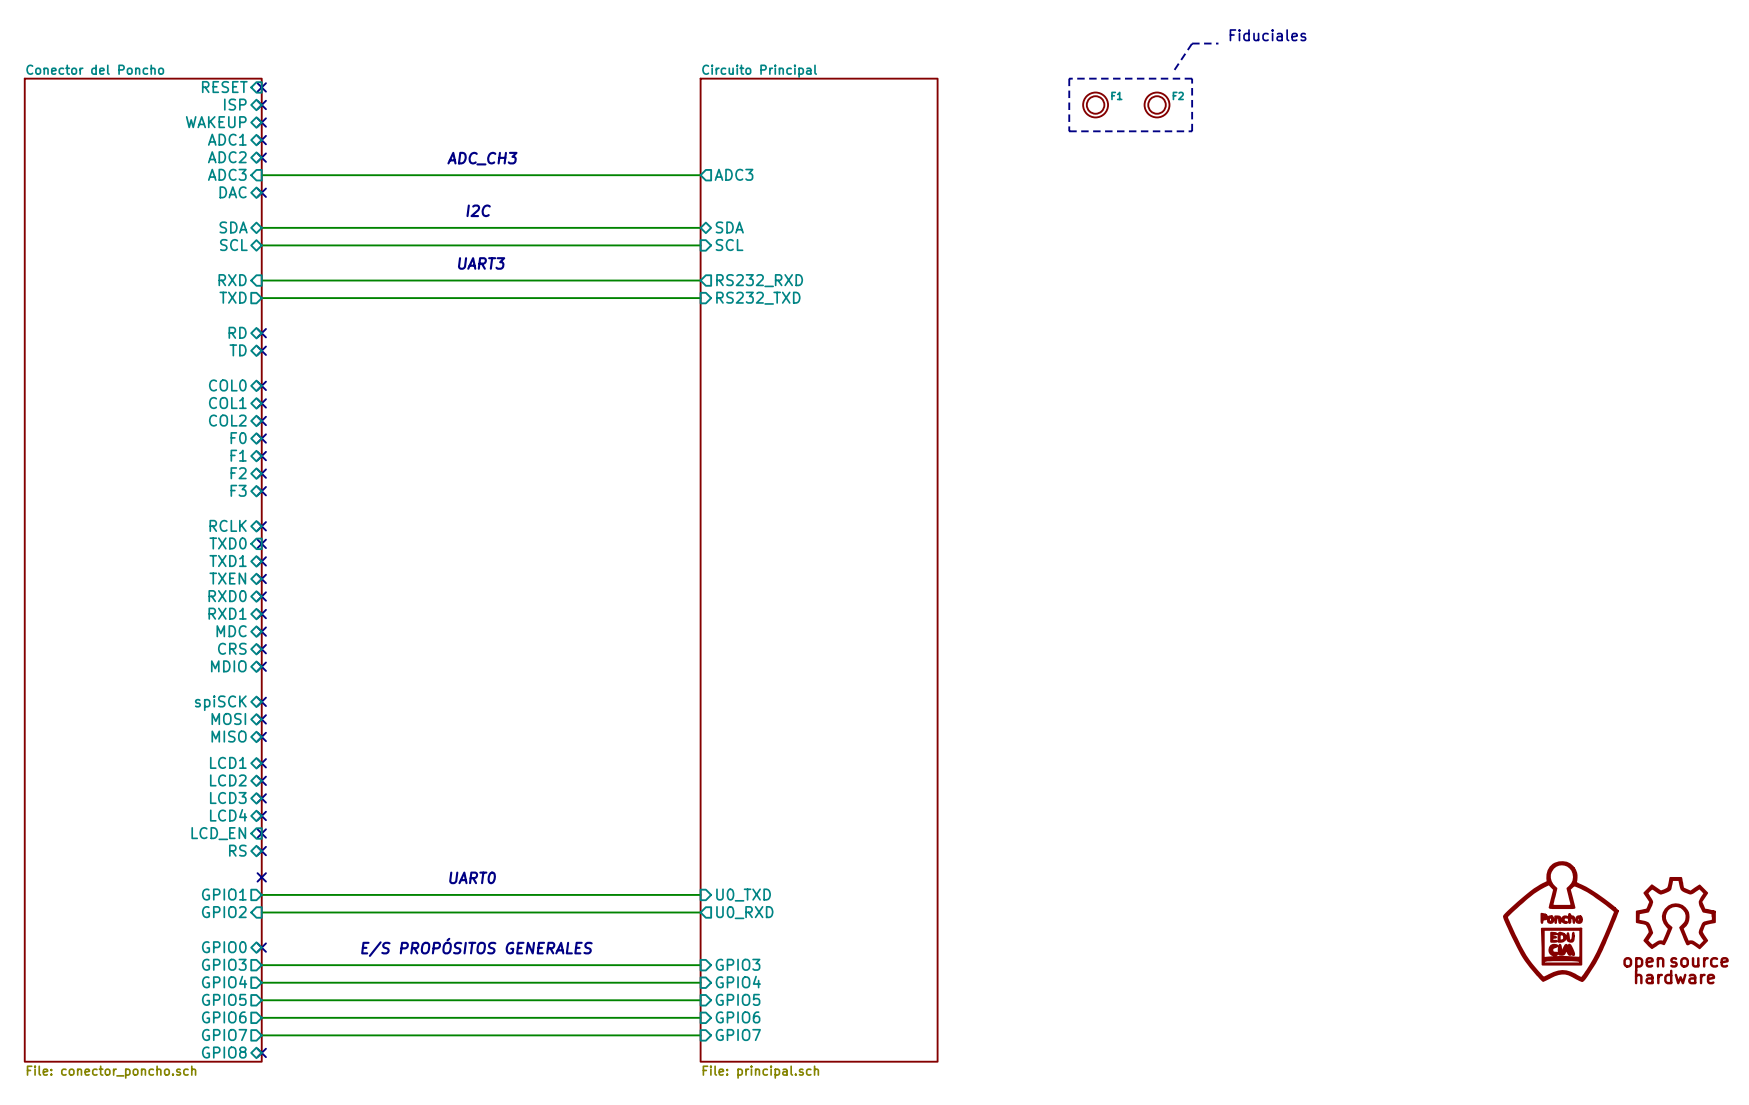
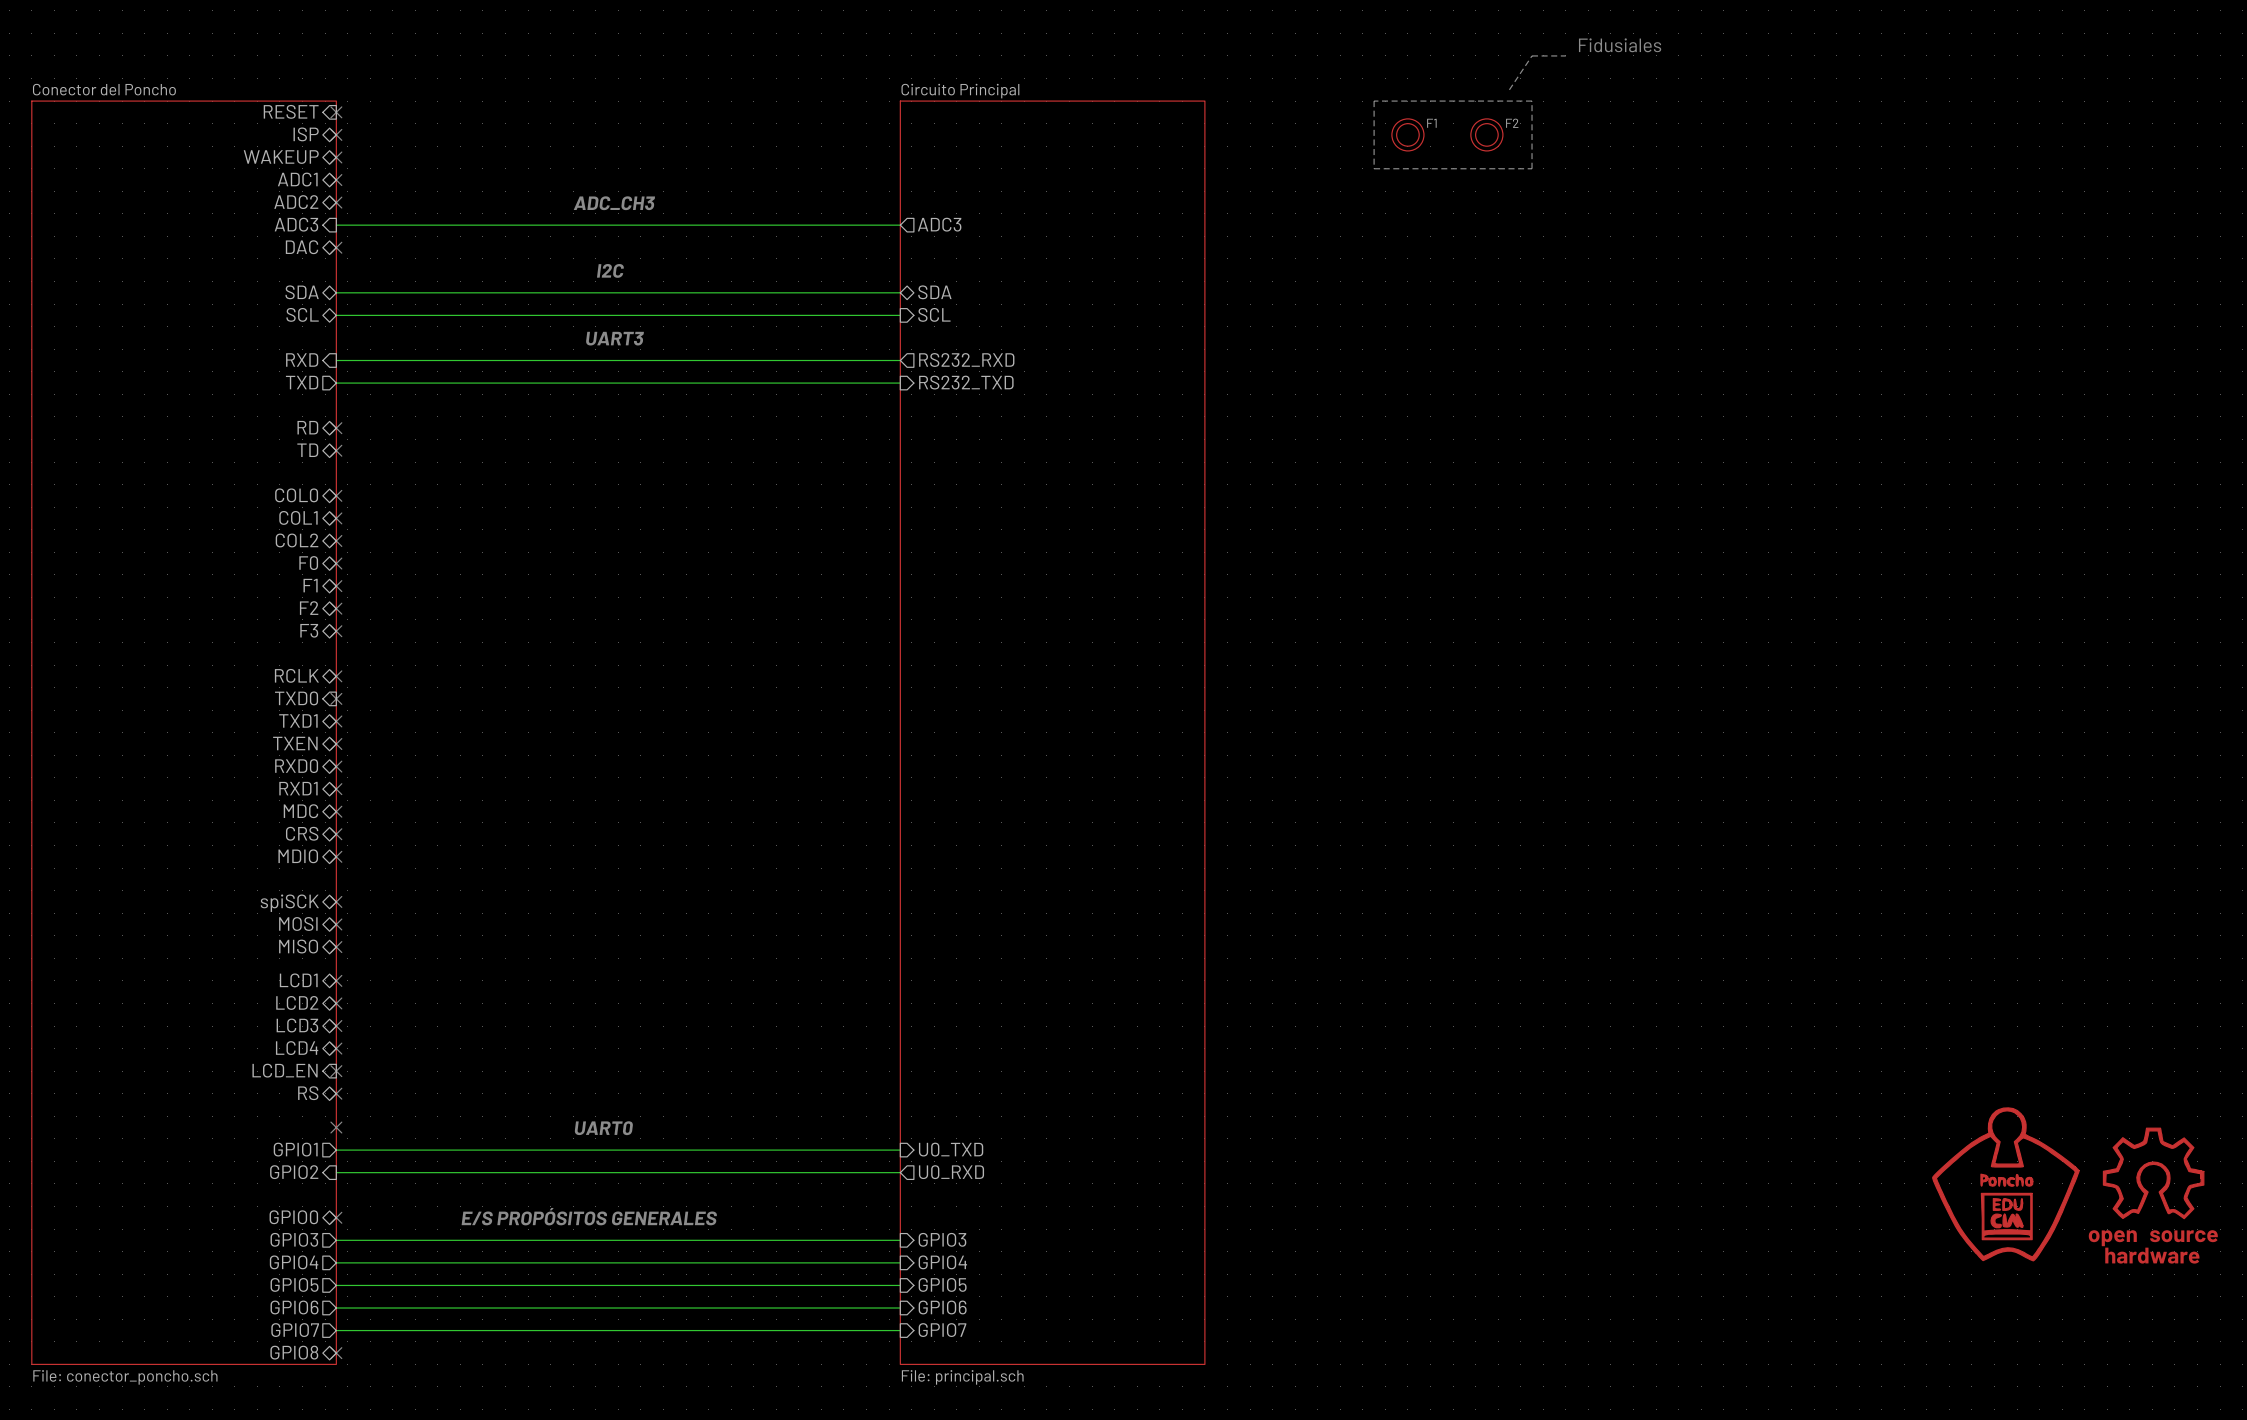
text: Fiduciales (1268, 35) -> Fidusiales (1620, 45)

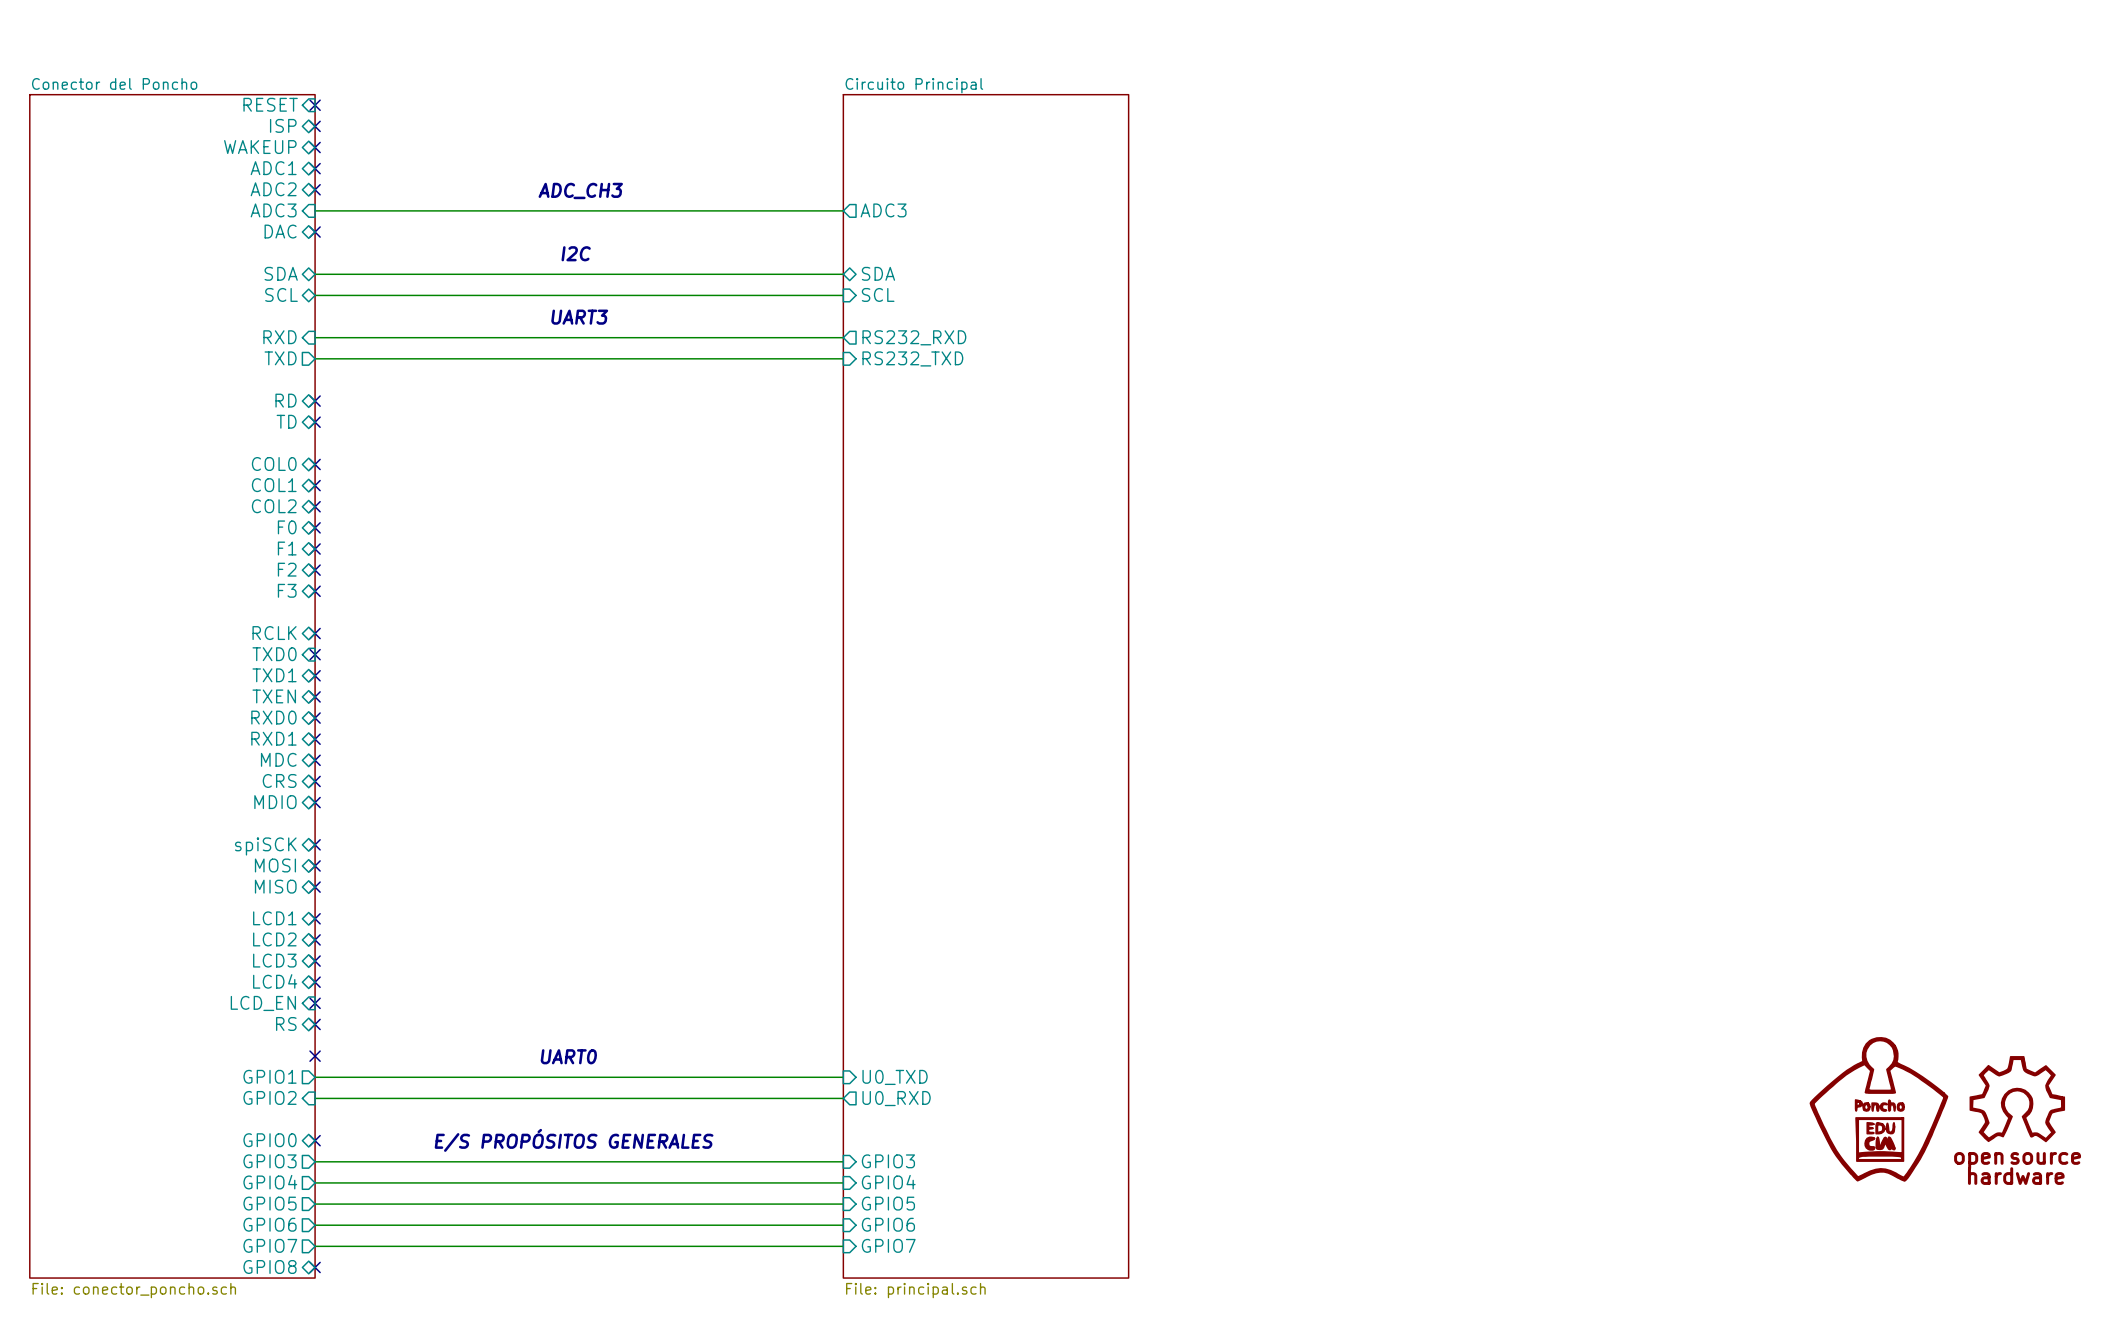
text: Fidusiales (1620, 45) -> none
line: (1565, 55) (1532, 55) (1509, 89) -> none
line: (1374, 101) (1374, 168) (1532, 168) (1532, 101) (1374, 101) -> none
F1: (1407, 134) -> none
F2: (1486, 134) -> none

